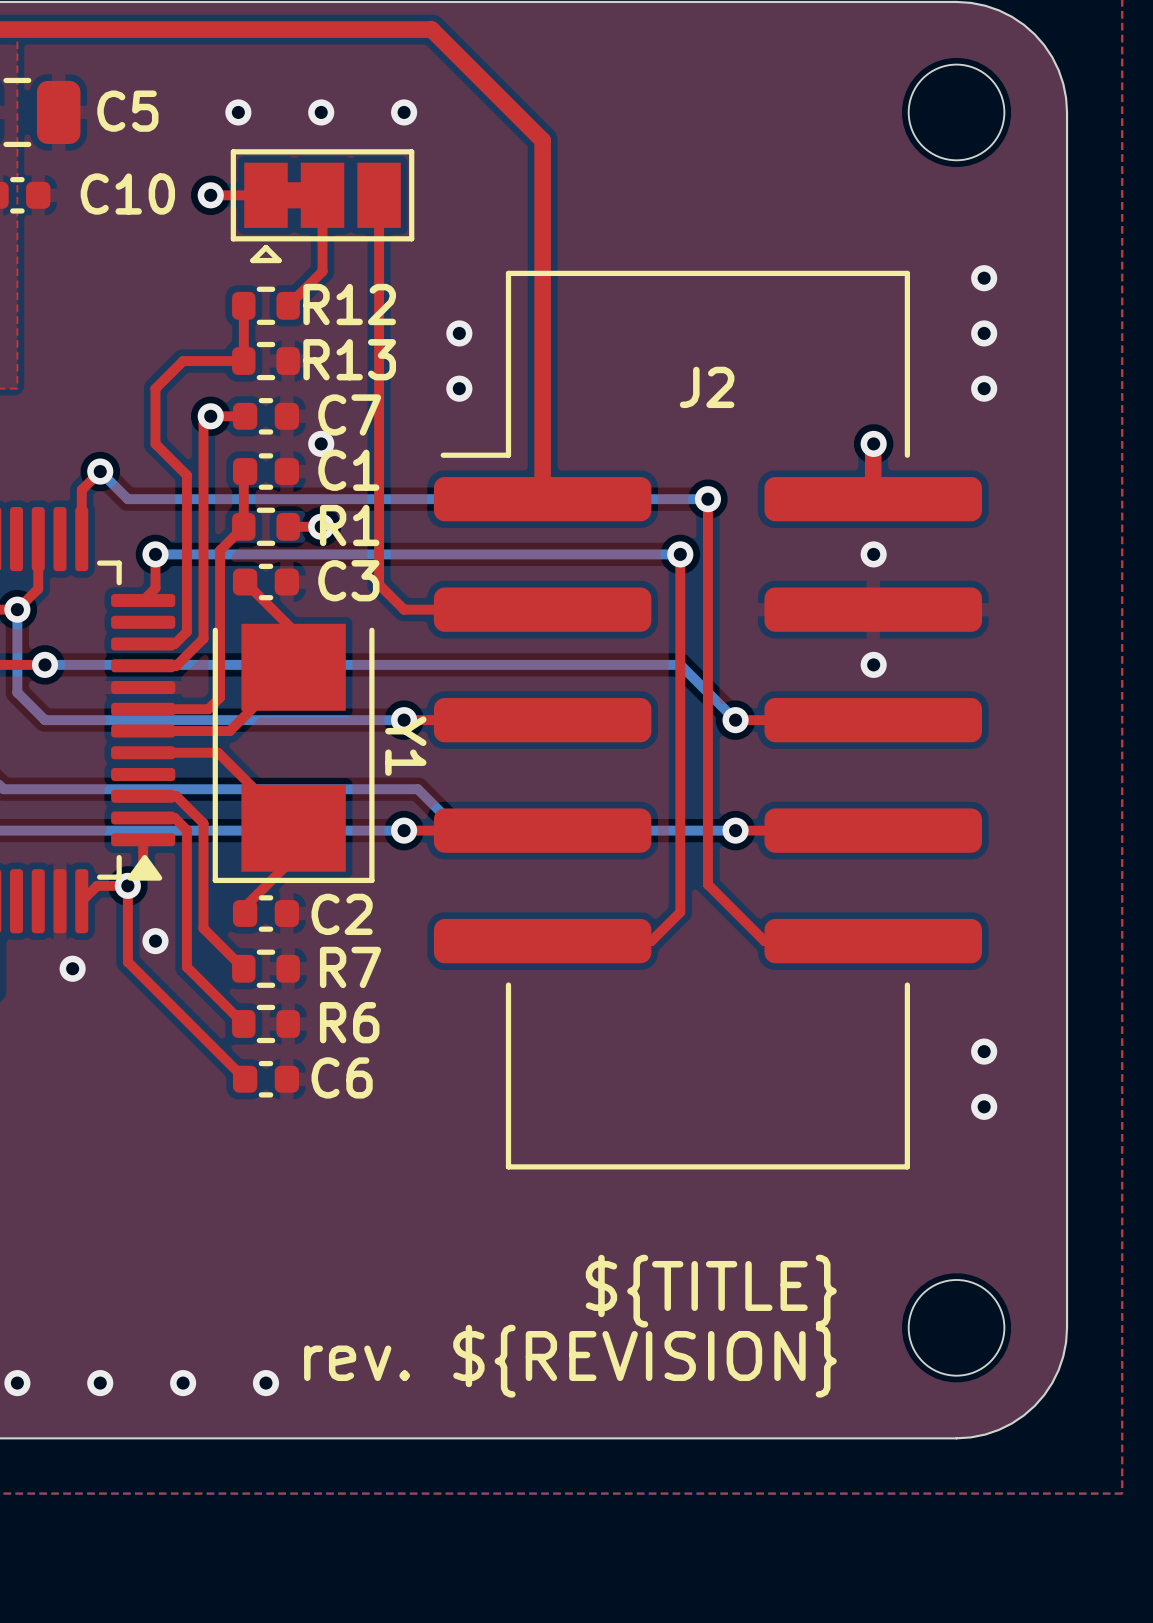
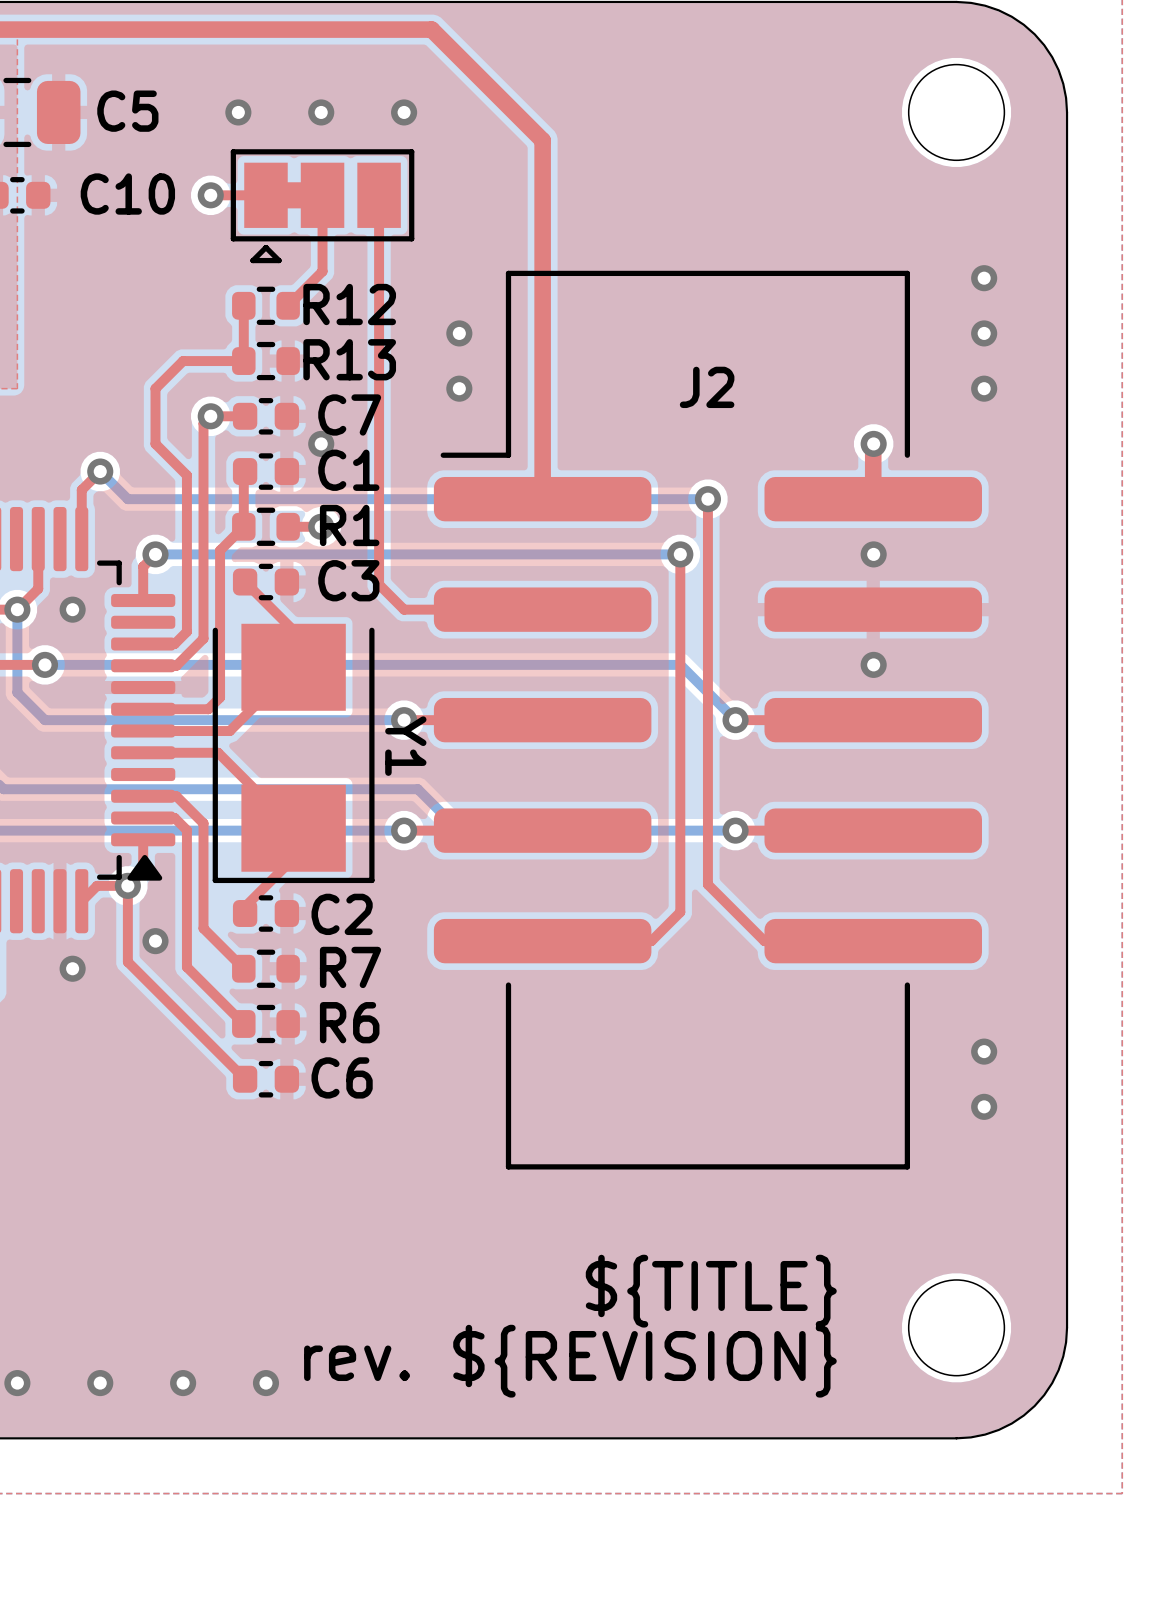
top track: (155, 554) (155, 588) (143, 600) -> (155, 554) (143, 566) (143, 600)
via: none -> (72, 609)

